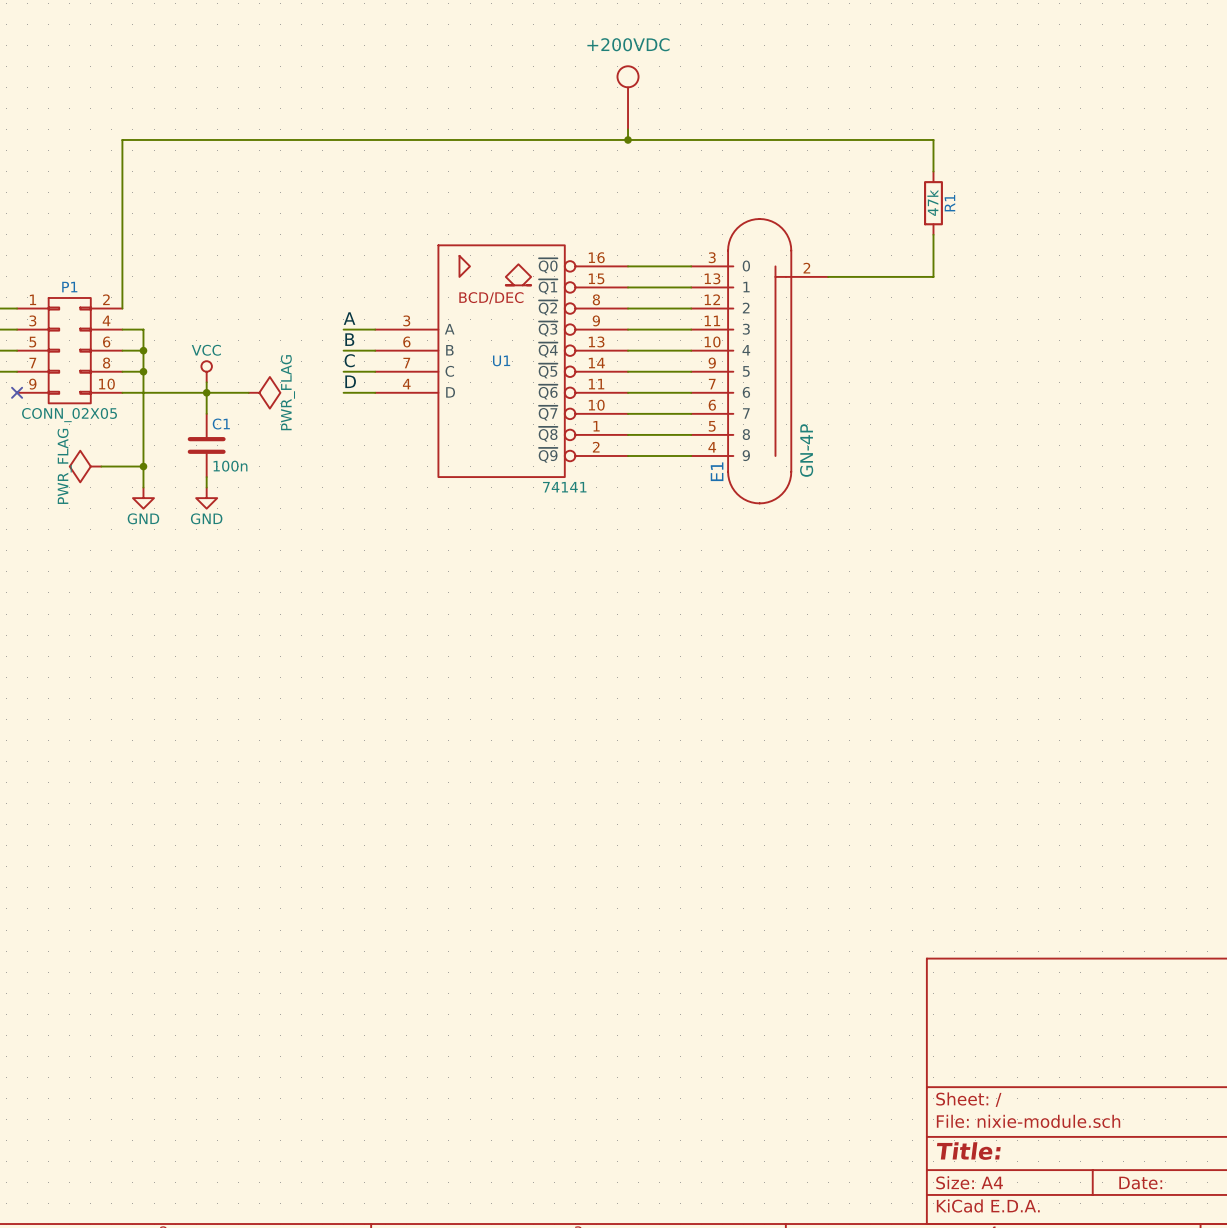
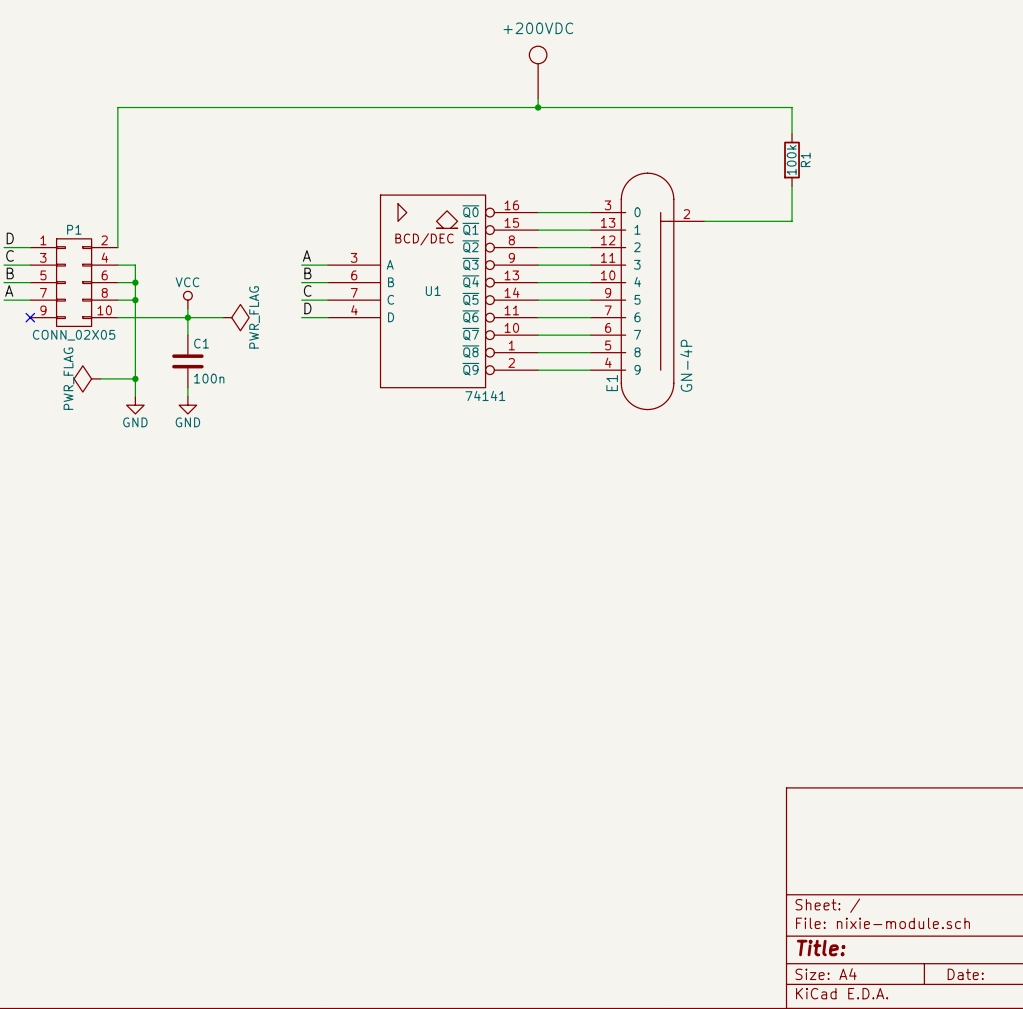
R1 value: 47k (932, 202) -> 100k (791, 160)

